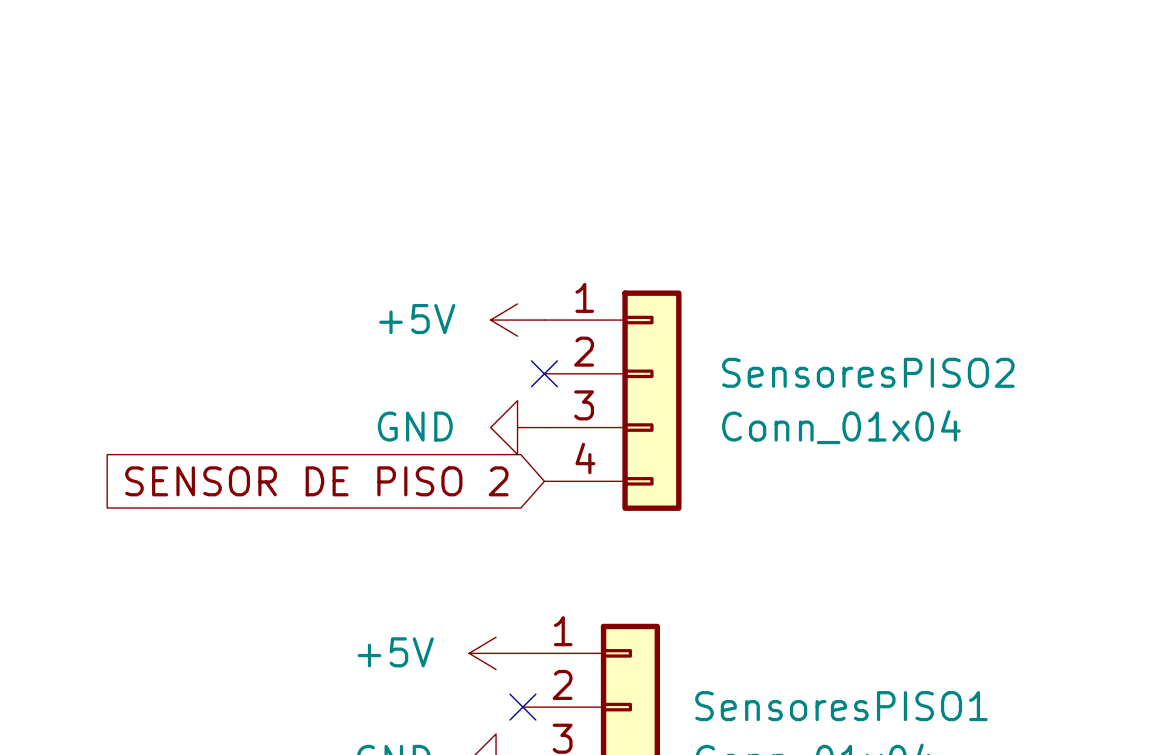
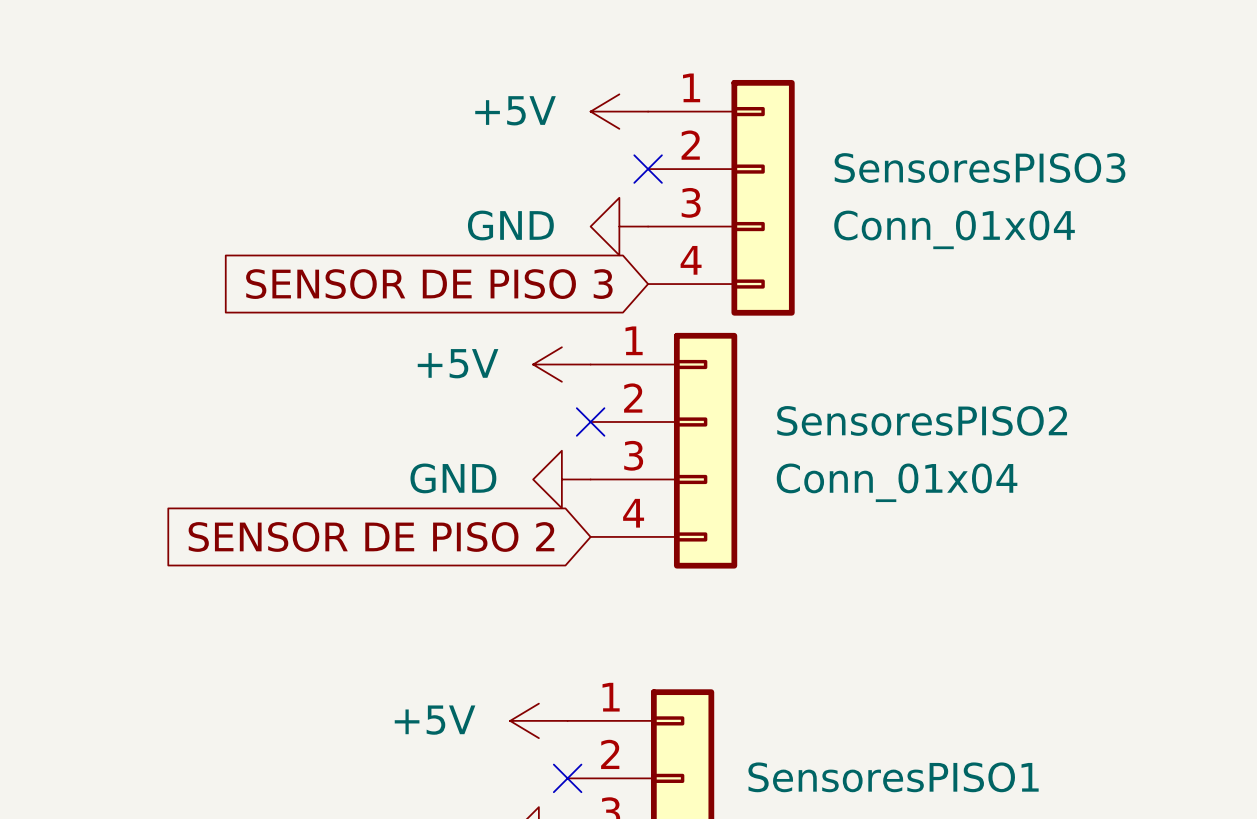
power symbol: none -> +5V (619, 111)
no-connect mark: none -> (648, 169)
SensoresPISO3: none -> Conn_01x04 (721, 197)
power symbol: none -> GND (619, 226)
global label: none -> SENSOR DE PISO 3 (429, 284)

